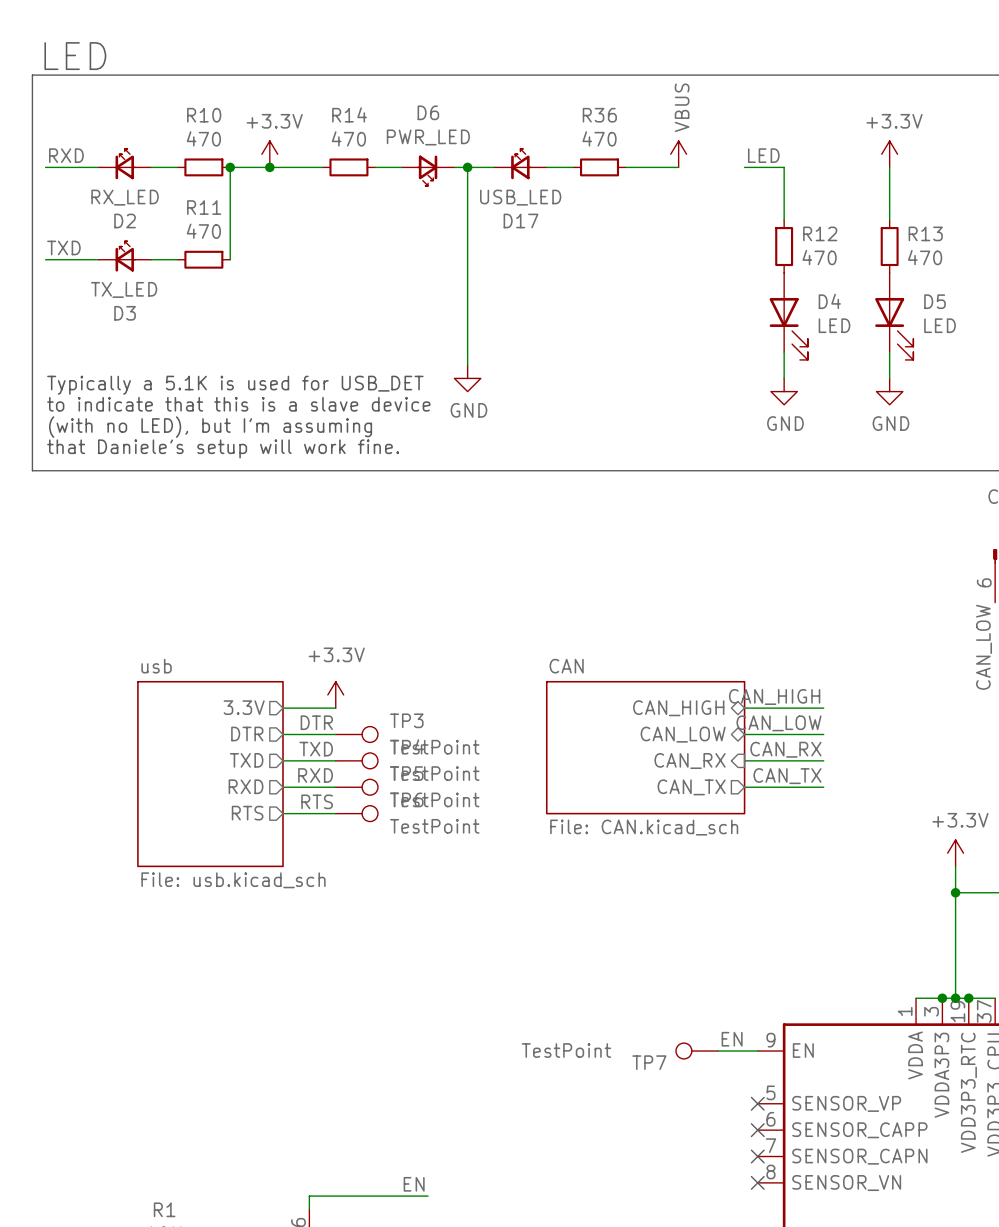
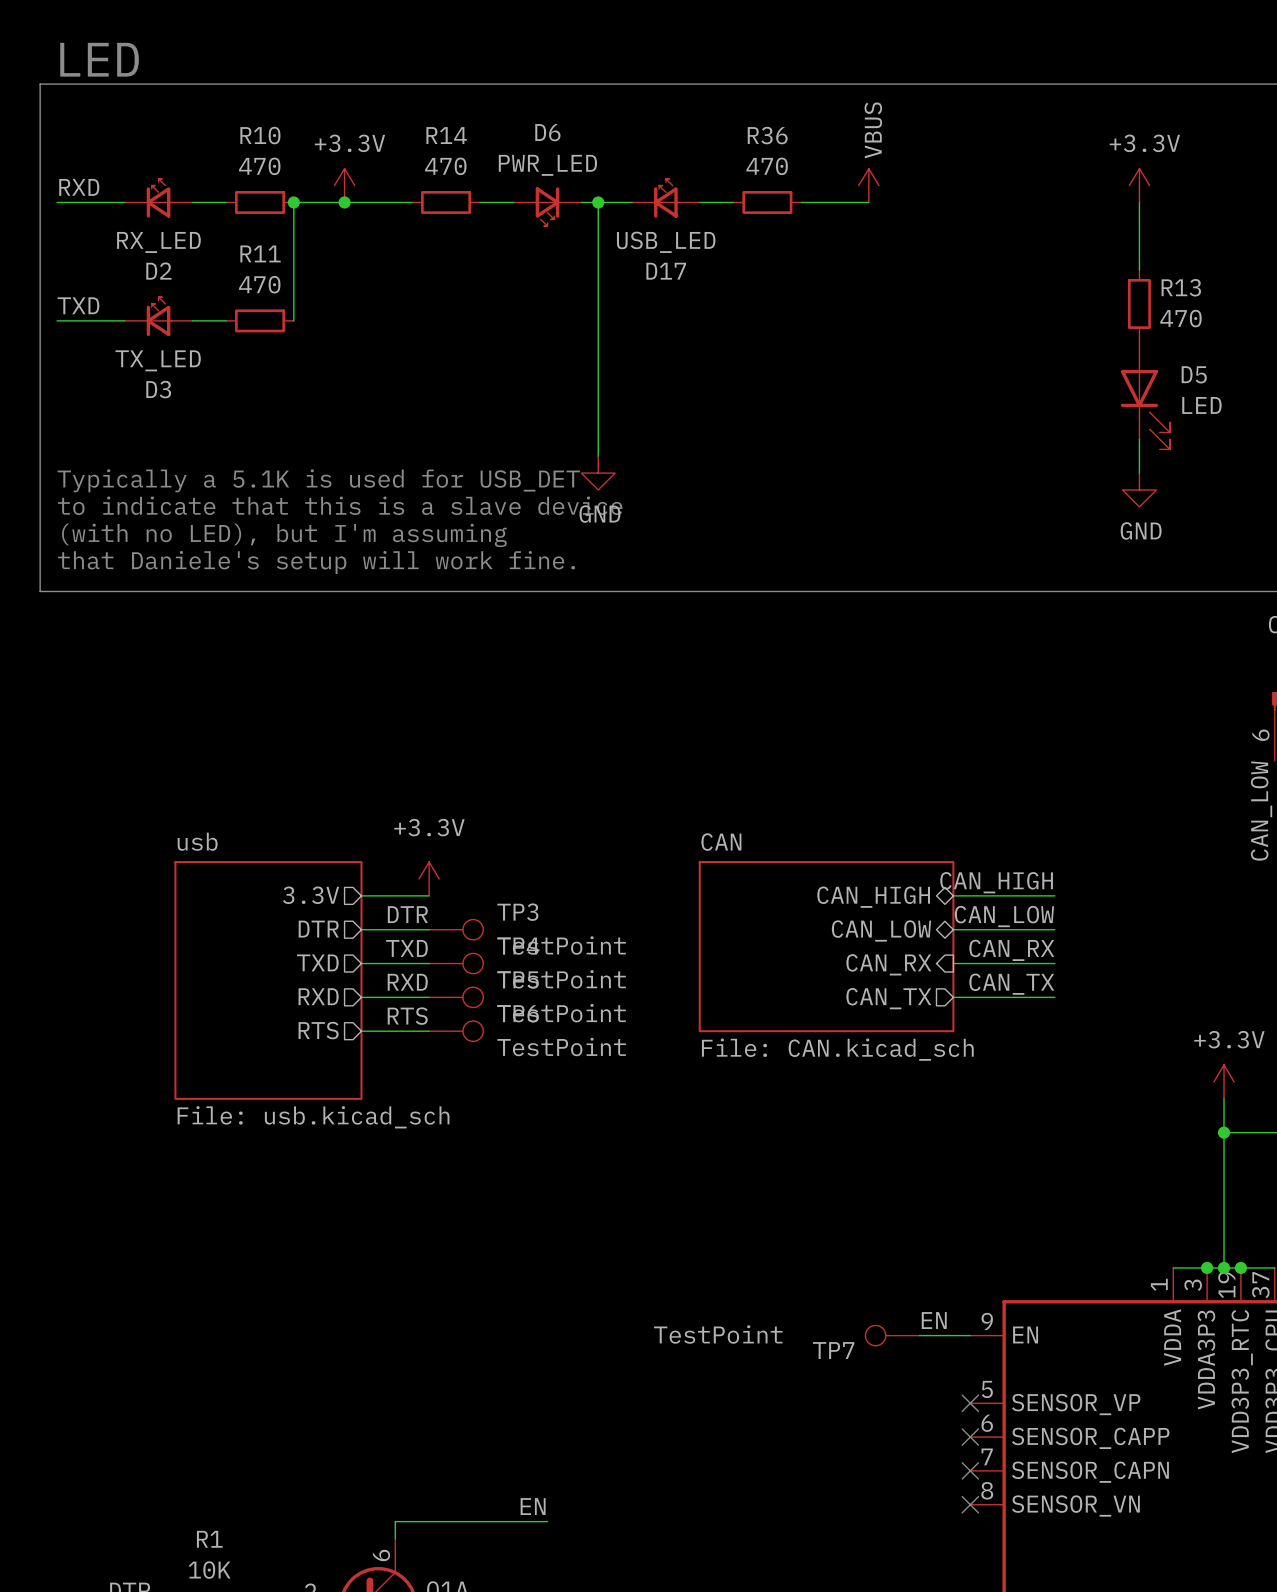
label: LED (763, 155) -> none
wire: (744, 167) (784, 167) (784, 220) -> none
R12: 470 (784, 246) -> none
D4: LED (788, 316) -> none
wire: (784, 352) (784, 378) -> none
power symbol: GND (784, 391) -> none

